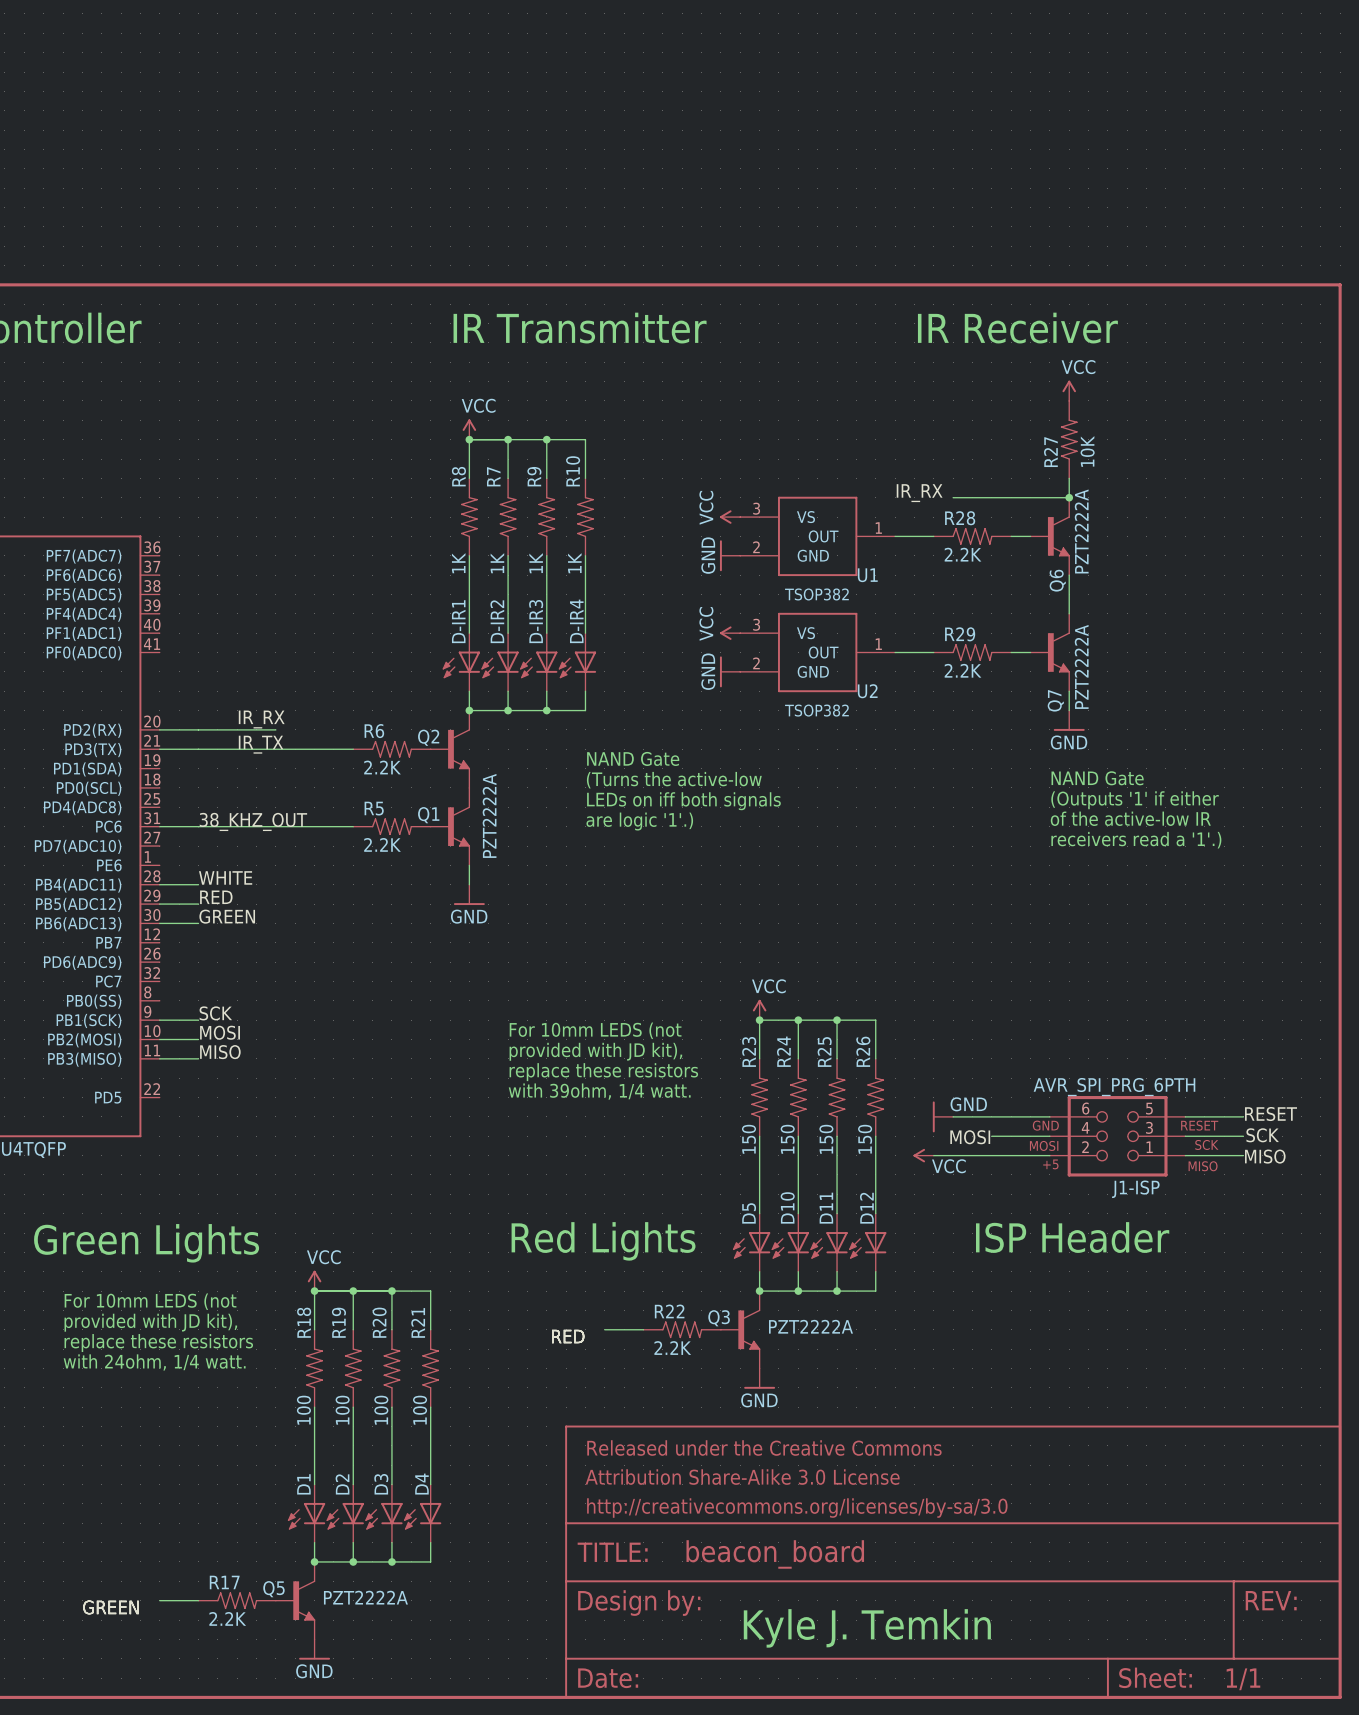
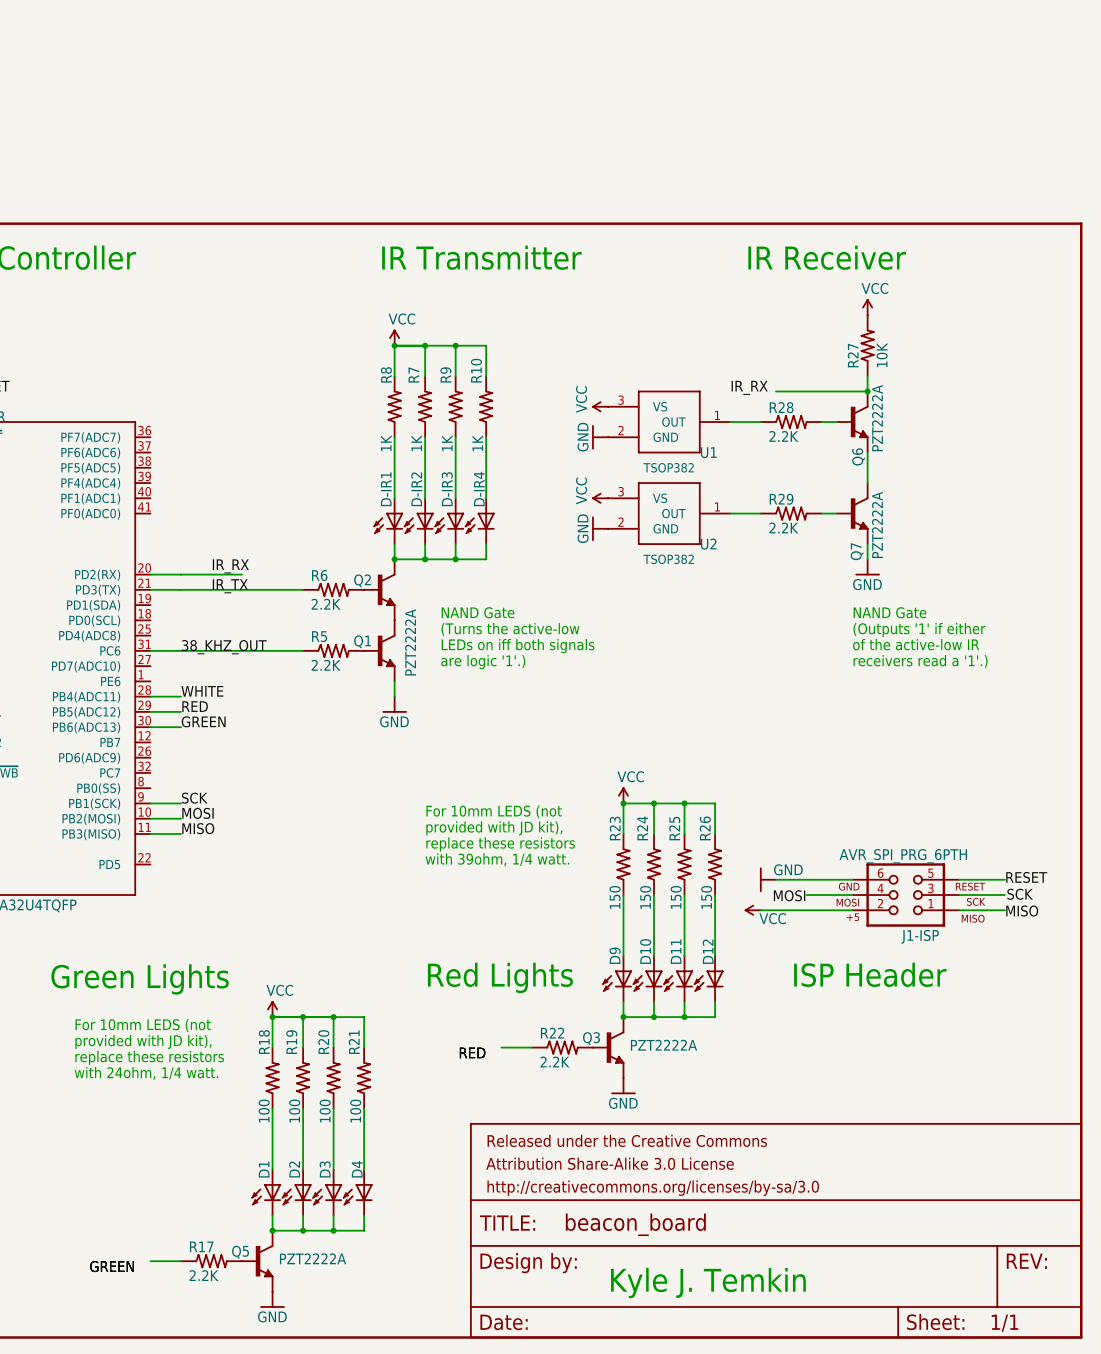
text position: NAND Gate (633, 758) -> NAND Gate (478, 612)
text position: (Turns the active-low (674, 780) -> (Turns the active-low (510, 629)
text position: LEDs on iff both signals (683, 801) -> LEDs on iff both signals (518, 646)
text position: are logic '1'.) (639, 821) -> are logic '1'.) (483, 662)
D5 name: D5 (749, 1213) -> D9 (615, 955)

